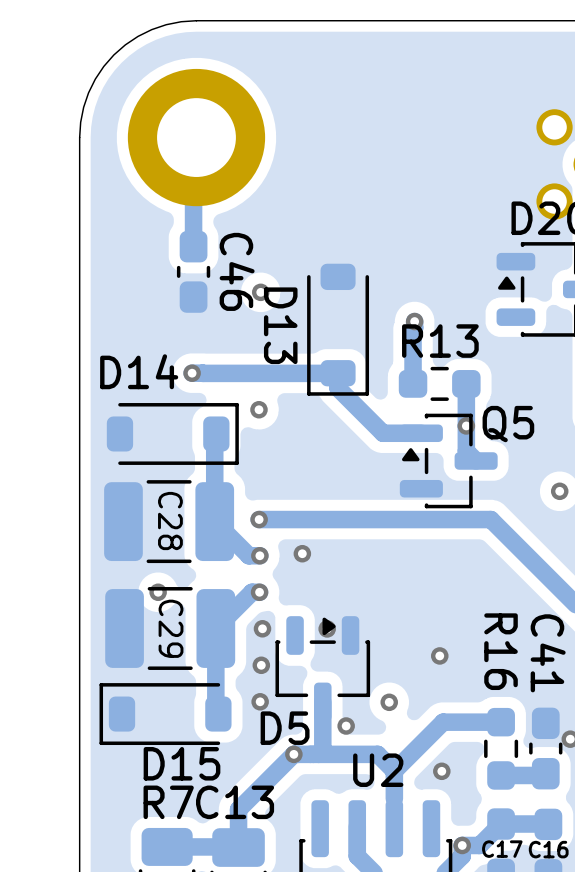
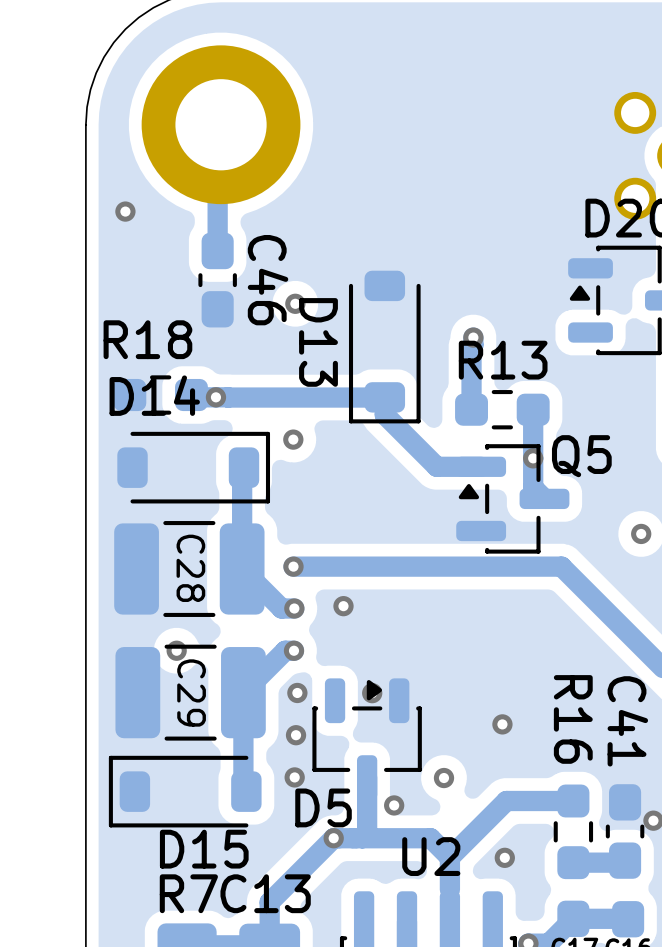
via: none -> (125, 211)
R18: none -> (160, 395)

